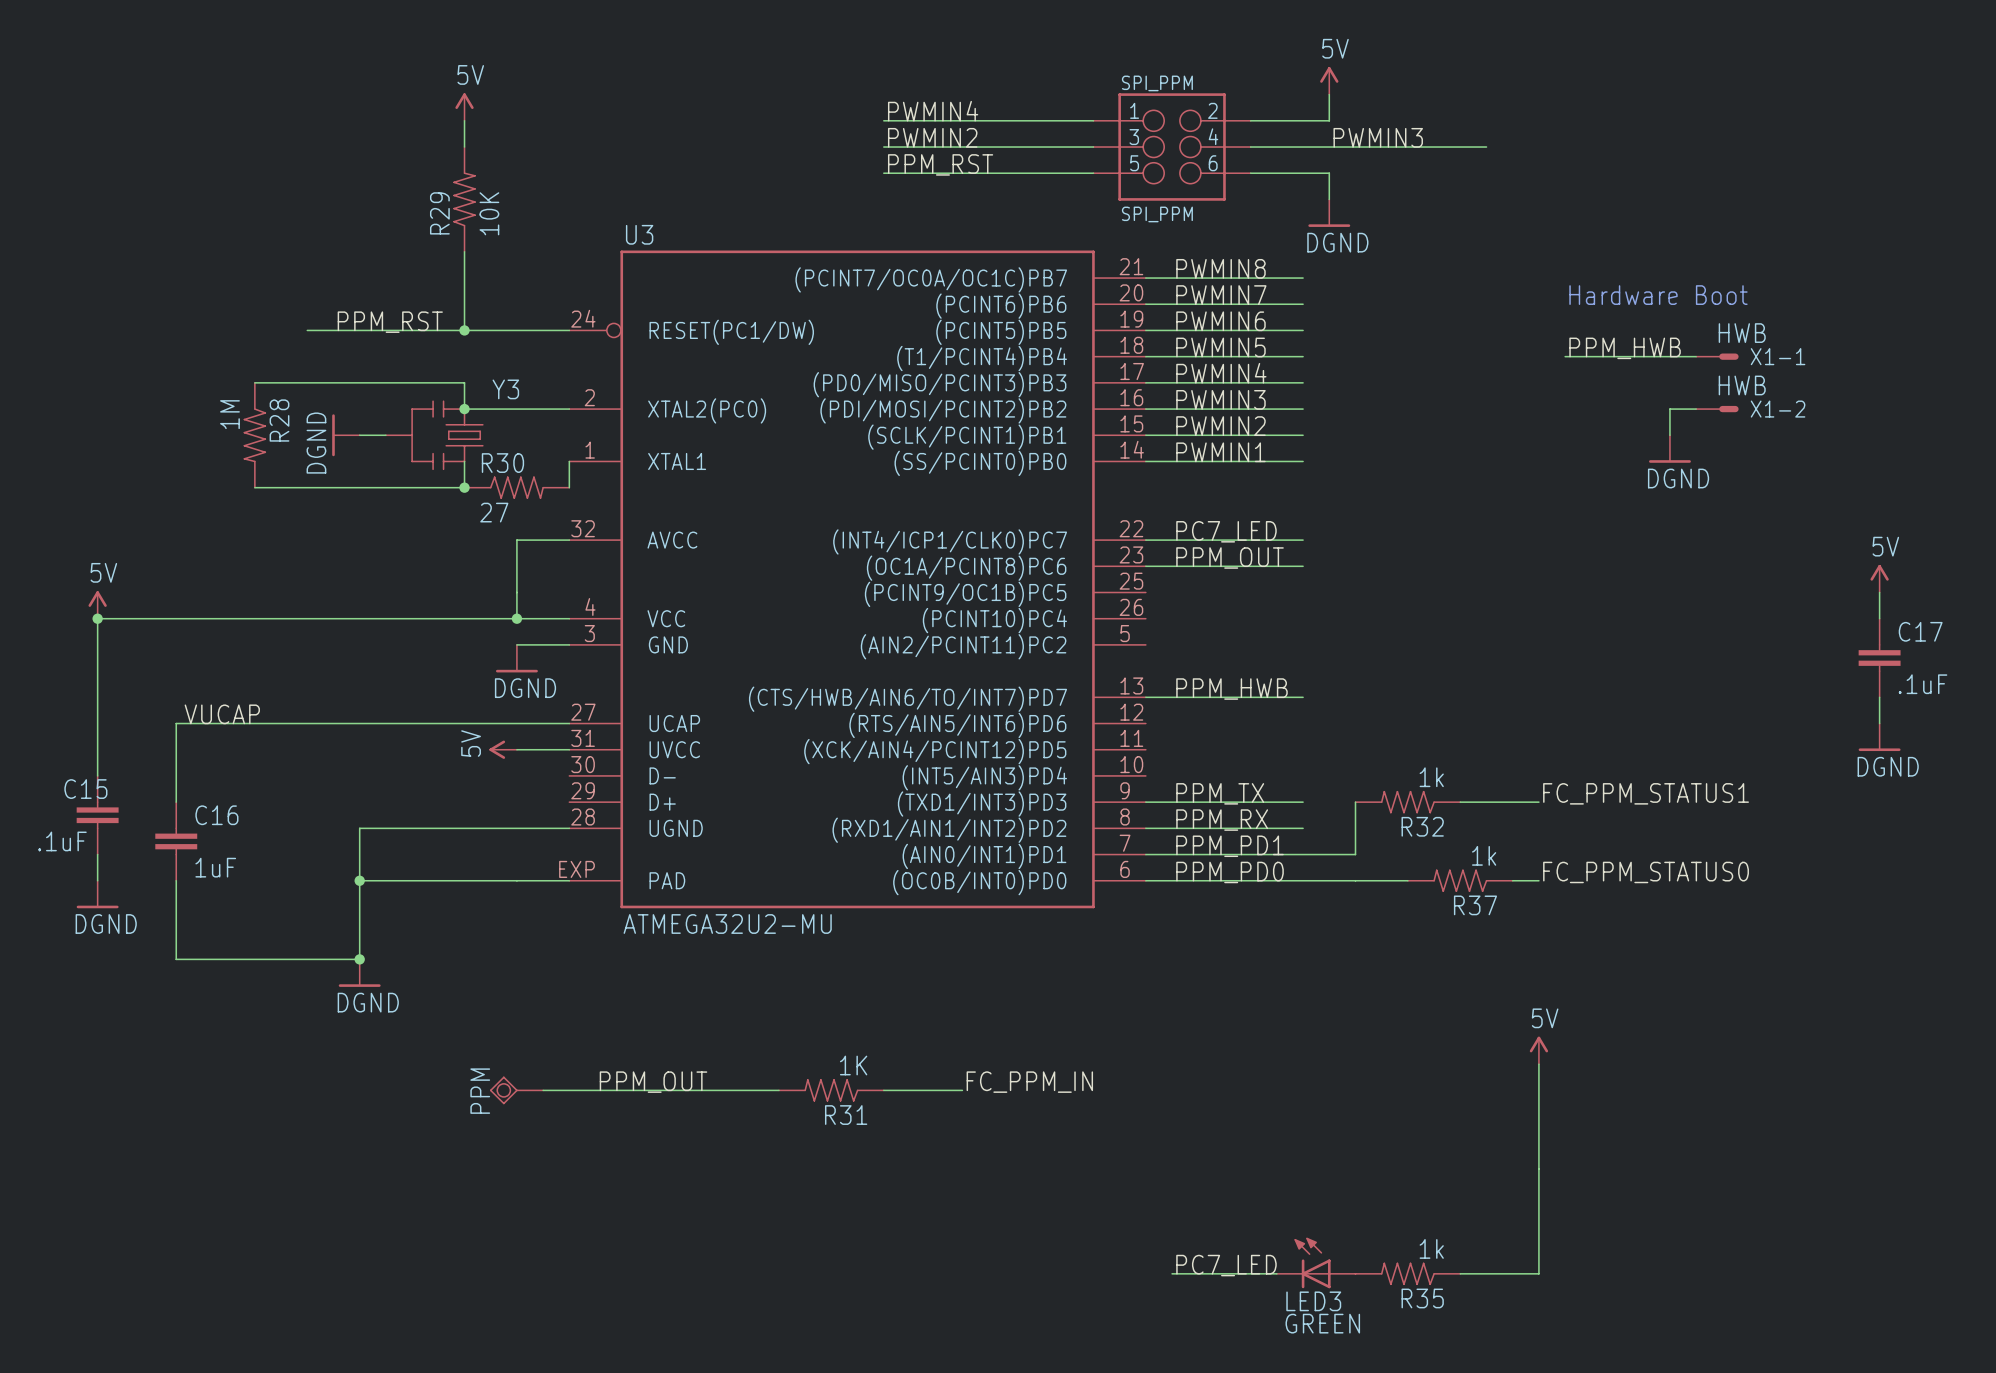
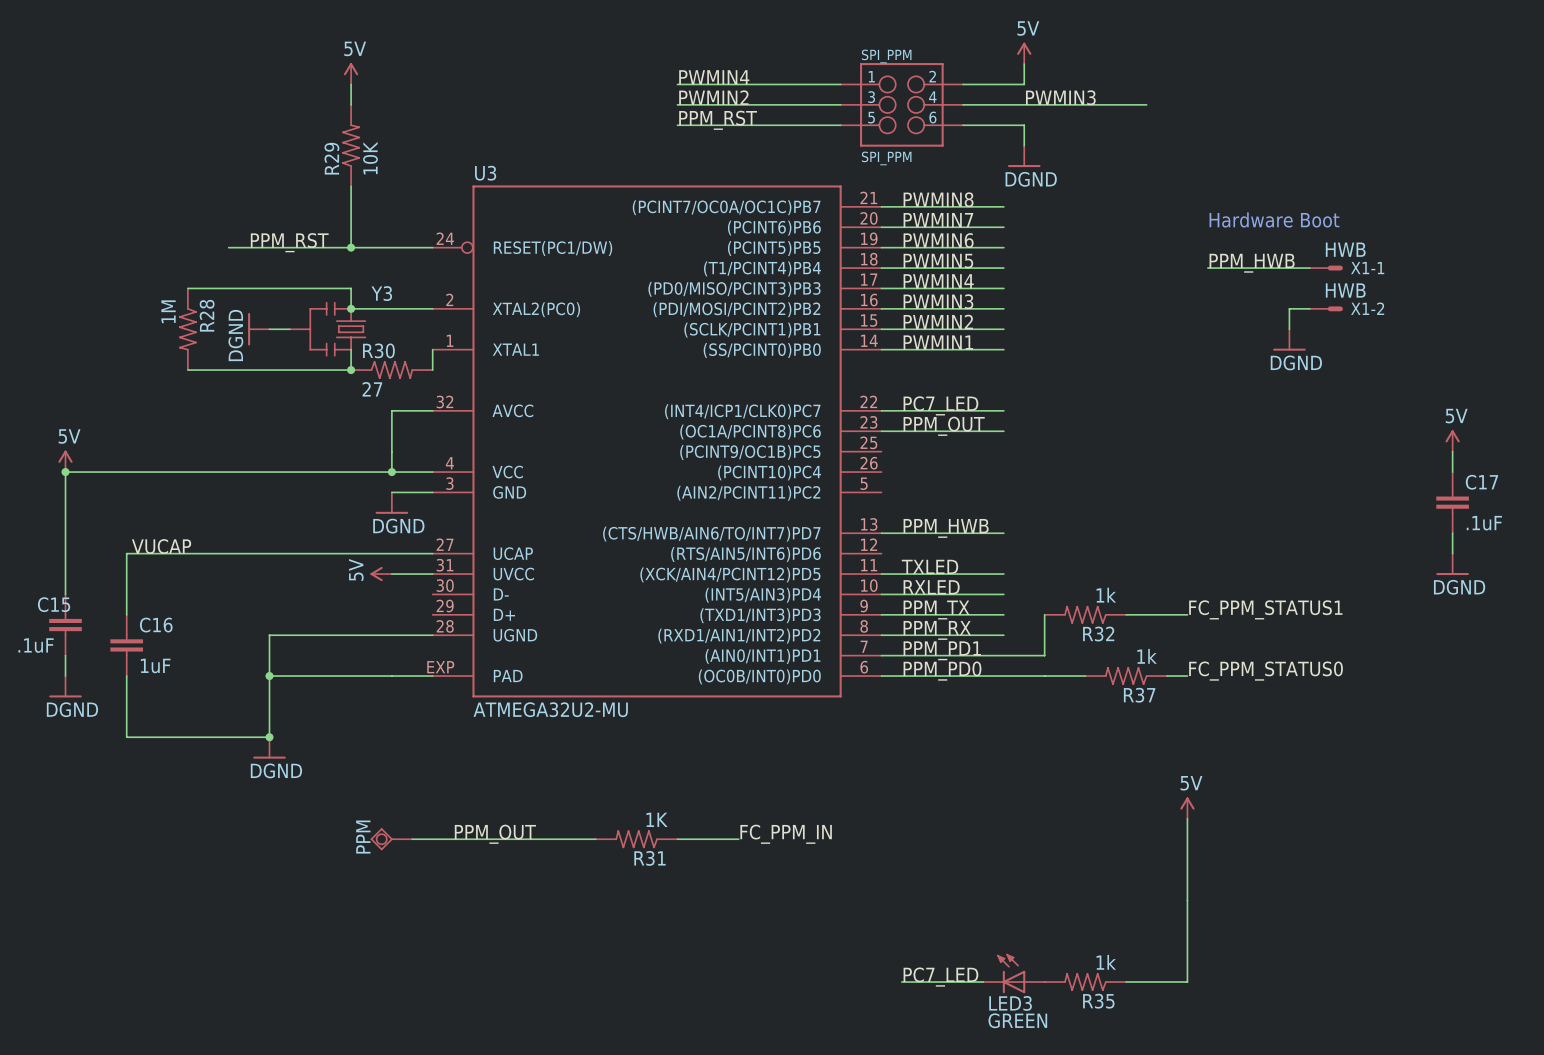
label: none -> TXLED (929, 566)
wire: none -> (881, 574) (1003, 574)
label: none -> RXLED (931, 587)
wire: none -> (881, 594) (1003, 594)

